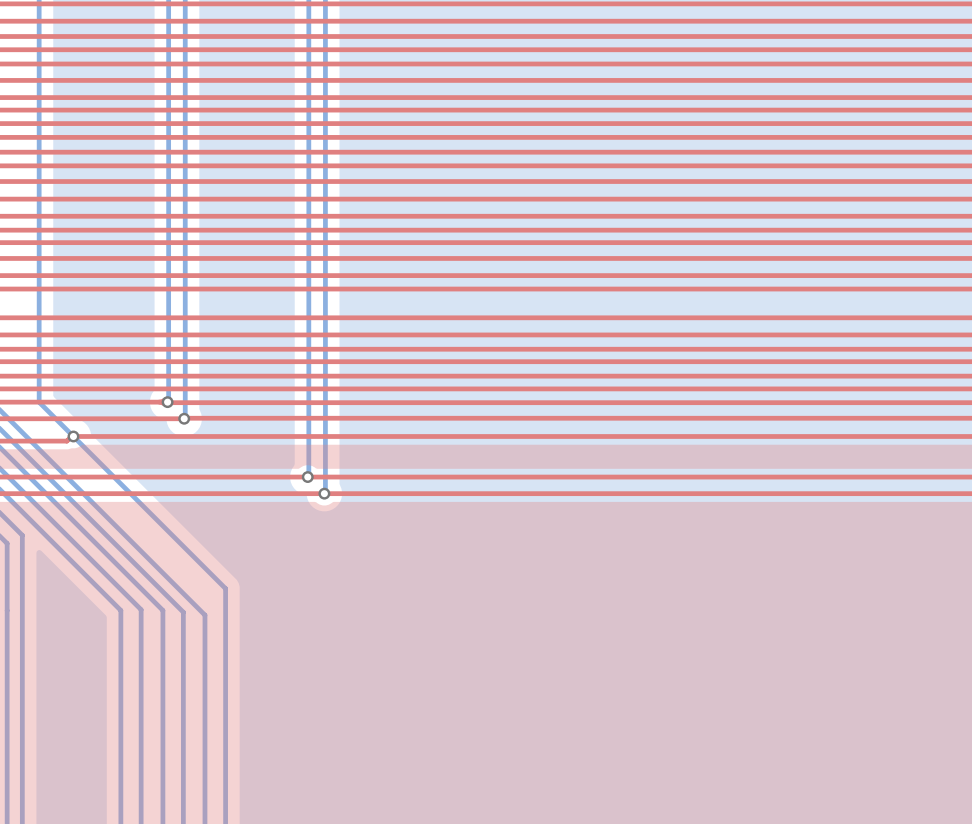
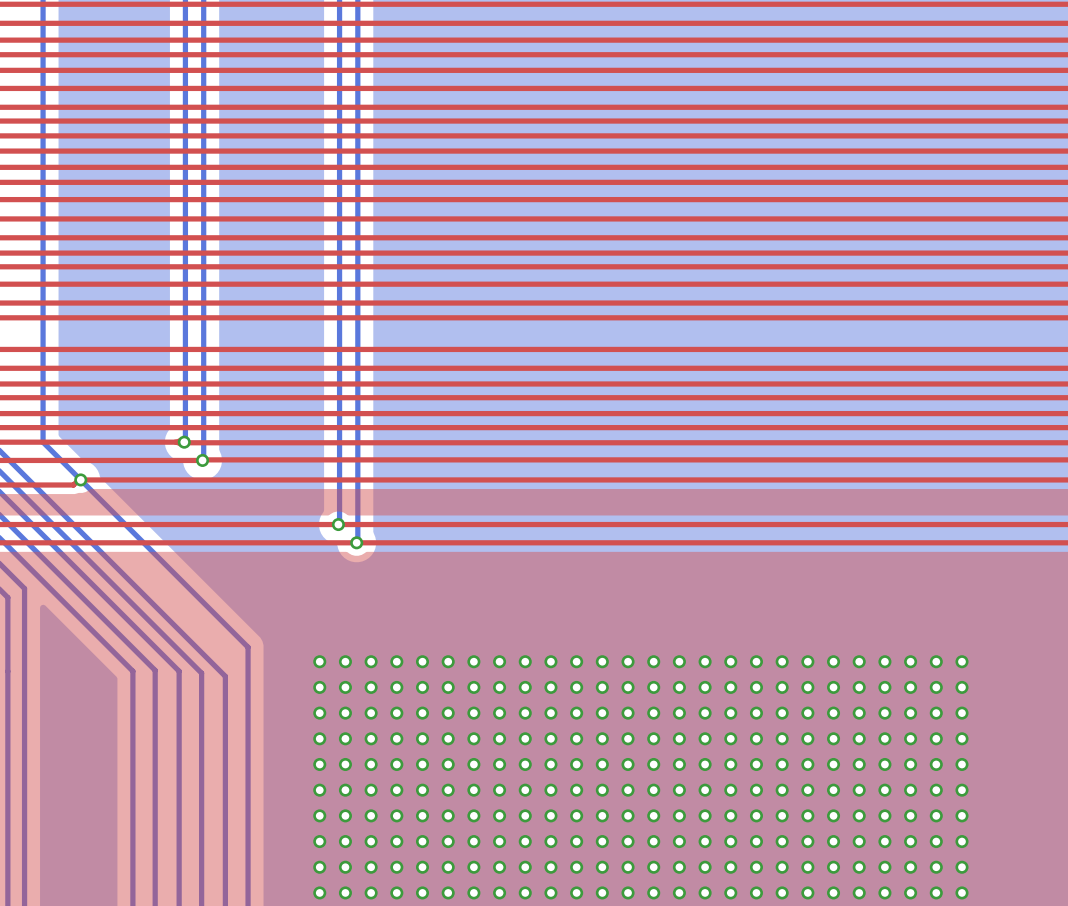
via: none -> (319, 661)
via: none -> (345, 661)
via: none -> (371, 661)
via: none -> (396, 661)
via: none -> (422, 661)
via: none -> (448, 661)
via: none -> (473, 661)
via: none -> (499, 661)
via: none -> (525, 661)
via: none -> (550, 661)
via: none -> (576, 661)
via: none -> (602, 661)
via: none -> (628, 661)
via: none -> (653, 661)
via: none -> (679, 661)
via: none -> (705, 661)
via: none -> (730, 661)
via: none -> (756, 661)
via: none -> (782, 661)
via: none -> (807, 661)
via: none -> (833, 661)
via: none -> (859, 661)
via: none -> (884, 661)
via: none -> (910, 661)
via: none -> (936, 661)
via: none -> (961, 661)
via: none -> (319, 687)
via: none -> (345, 687)
via: none -> (371, 687)
via: none -> (396, 687)
via: none -> (422, 687)
via: none -> (448, 687)
via: none -> (473, 687)
via: none -> (499, 687)
via: none -> (525, 687)
via: none -> (550, 687)
via: none -> (576, 687)
via: none -> (602, 687)
via: none -> (628, 687)
via: none -> (653, 687)
via: none -> (679, 687)
via: none -> (705, 687)
via: none -> (730, 687)
via: none -> (756, 687)
via: none -> (782, 687)
via: none -> (807, 687)
via: none -> (833, 687)
via: none -> (859, 687)
via: none -> (884, 687)
via: none -> (910, 687)
via: none -> (936, 687)
via: none -> (961, 687)
via: none -> (319, 713)
via: none -> (345, 713)
via: none -> (371, 713)
via: none -> (396, 713)
via: none -> (422, 713)
via: none -> (448, 713)
via: none -> (473, 713)
via: none -> (499, 713)
via: none -> (525, 713)
via: none -> (550, 713)
via: none -> (576, 713)
via: none -> (602, 713)
via: none -> (628, 713)
via: none -> (653, 713)
via: none -> (679, 713)
via: none -> (705, 713)
via: none -> (730, 713)
via: none -> (756, 713)
via: none -> (782, 713)
via: none -> (807, 713)
via: none -> (833, 713)
via: none -> (859, 713)
via: none -> (884, 713)
via: none -> (910, 713)
via: none -> (936, 713)
via: none -> (961, 713)
via: none -> (319, 738)
via: none -> (345, 738)
via: none -> (371, 738)
via: none -> (396, 738)
via: none -> (422, 738)
via: none -> (448, 738)
via: none -> (473, 738)
via: none -> (499, 738)
via: none -> (525, 738)
via: none -> (550, 738)
via: none -> (576, 738)
via: none -> (602, 738)
via: none -> (628, 738)
via: none -> (653, 738)
via: none -> (679, 738)
via: none -> (705, 738)
via: none -> (730, 738)
via: none -> (756, 738)
via: none -> (782, 738)
via: none -> (807, 738)
via: none -> (833, 738)
via: none -> (859, 738)
via: none -> (884, 738)
via: none -> (910, 738)
via: none -> (936, 738)
via: none -> (961, 738)
via: none -> (319, 764)
via: none -> (345, 764)
via: none -> (371, 764)
via: none -> (396, 764)
via: none -> (422, 764)
via: none -> (448, 764)
via: none -> (473, 764)
via: none -> (499, 764)
via: none -> (525, 764)
via: none -> (550, 764)
via: none -> (576, 764)
via: none -> (602, 764)
via: none -> (628, 764)
via: none -> (653, 764)
via: none -> (679, 764)
via: none -> (705, 764)
via: none -> (730, 764)
via: none -> (756, 764)
via: none -> (782, 764)
via: none -> (807, 764)
via: none -> (833, 764)
via: none -> (859, 764)
via: none -> (884, 764)
via: none -> (910, 764)
via: none -> (936, 764)
via: none -> (961, 764)
via: none -> (319, 790)
via: none -> (345, 790)
via: none -> (371, 790)
via: none -> (396, 790)
via: none -> (422, 790)
via: none -> (448, 790)
via: none -> (473, 790)
via: none -> (499, 790)
via: none -> (525, 790)
via: none -> (550, 790)
via: none -> (576, 790)
via: none -> (602, 790)
via: none -> (628, 790)
via: none -> (653, 790)
via: none -> (679, 790)
via: none -> (705, 790)
via: none -> (730, 790)
via: none -> (756, 790)
via: none -> (782, 790)
via: none -> (807, 790)
via: none -> (833, 790)
via: none -> (859, 790)
via: none -> (884, 790)
via: none -> (910, 790)
via: none -> (936, 790)
via: none -> (961, 790)
via: none -> (319, 815)
via: none -> (345, 815)
via: none -> (371, 815)
via: none -> (396, 815)
via: none -> (422, 815)
via: none -> (448, 815)
via: none -> (473, 815)
via: none -> (499, 815)
via: none -> (525, 815)
via: none -> (550, 815)
via: none -> (576, 815)
via: none -> (602, 815)
via: none -> (628, 815)
via: none -> (653, 815)
via: none -> (679, 815)
via: none -> (705, 815)
via: none -> (730, 815)
via: none -> (756, 815)
via: none -> (782, 815)
via: none -> (807, 815)
via: none -> (833, 815)
via: none -> (859, 815)
via: none -> (884, 815)
via: none -> (910, 815)
via: none -> (936, 815)
via: none -> (961, 815)
via: none -> (319, 841)
via: none -> (345, 841)
via: none -> (371, 841)
via: none -> (396, 841)
via: none -> (422, 841)
via: none -> (448, 841)
via: none -> (473, 841)
via: none -> (499, 841)
via: none -> (525, 841)
via: none -> (550, 841)
via: none -> (576, 841)
via: none -> (602, 841)
via: none -> (628, 841)
via: none -> (653, 841)
via: none -> (679, 841)
via: none -> (705, 841)
via: none -> (730, 841)
via: none -> (756, 841)
via: none -> (782, 841)
via: none -> (807, 841)
via: none -> (833, 841)
via: none -> (859, 841)
via: none -> (884, 841)
via: none -> (910, 841)
via: none -> (936, 841)
via: none -> (961, 841)
via: none -> (319, 867)
via: none -> (345, 867)
via: none -> (371, 867)
via: none -> (396, 867)
via: none -> (422, 867)
via: none -> (448, 867)
via: none -> (473, 867)
via: none -> (499, 867)
via: none -> (525, 867)
via: none -> (550, 867)
via: none -> (576, 867)
via: none -> (602, 867)
via: none -> (628, 867)
via: none -> (653, 867)
via: none -> (679, 867)
via: none -> (705, 867)
via: none -> (730, 867)
via: none -> (756, 867)
via: none -> (782, 867)
via: none -> (807, 867)
via: none -> (833, 867)
via: none -> (859, 867)
via: none -> (884, 867)
via: none -> (910, 867)
via: none -> (936, 867)
via: none -> (961, 867)
via: none -> (319, 892)
via: none -> (345, 892)
via: none -> (371, 892)
via: none -> (396, 892)
via: none -> (422, 892)
via: none -> (448, 892)
via: none -> (473, 892)
via: none -> (499, 892)
via: none -> (525, 892)
via: none -> (550, 892)
via: none -> (576, 892)
via: none -> (602, 892)
via: none -> (628, 892)
via: none -> (653, 892)
via: none -> (679, 892)
via: none -> (705, 892)
via: none -> (730, 892)
via: none -> (756, 892)
via: none -> (782, 892)
via: none -> (807, 892)
via: none -> (833, 892)
via: none -> (859, 892)
via: none -> (884, 892)
via: none -> (910, 892)
via: none -> (936, 892)
via: none -> (961, 892)

